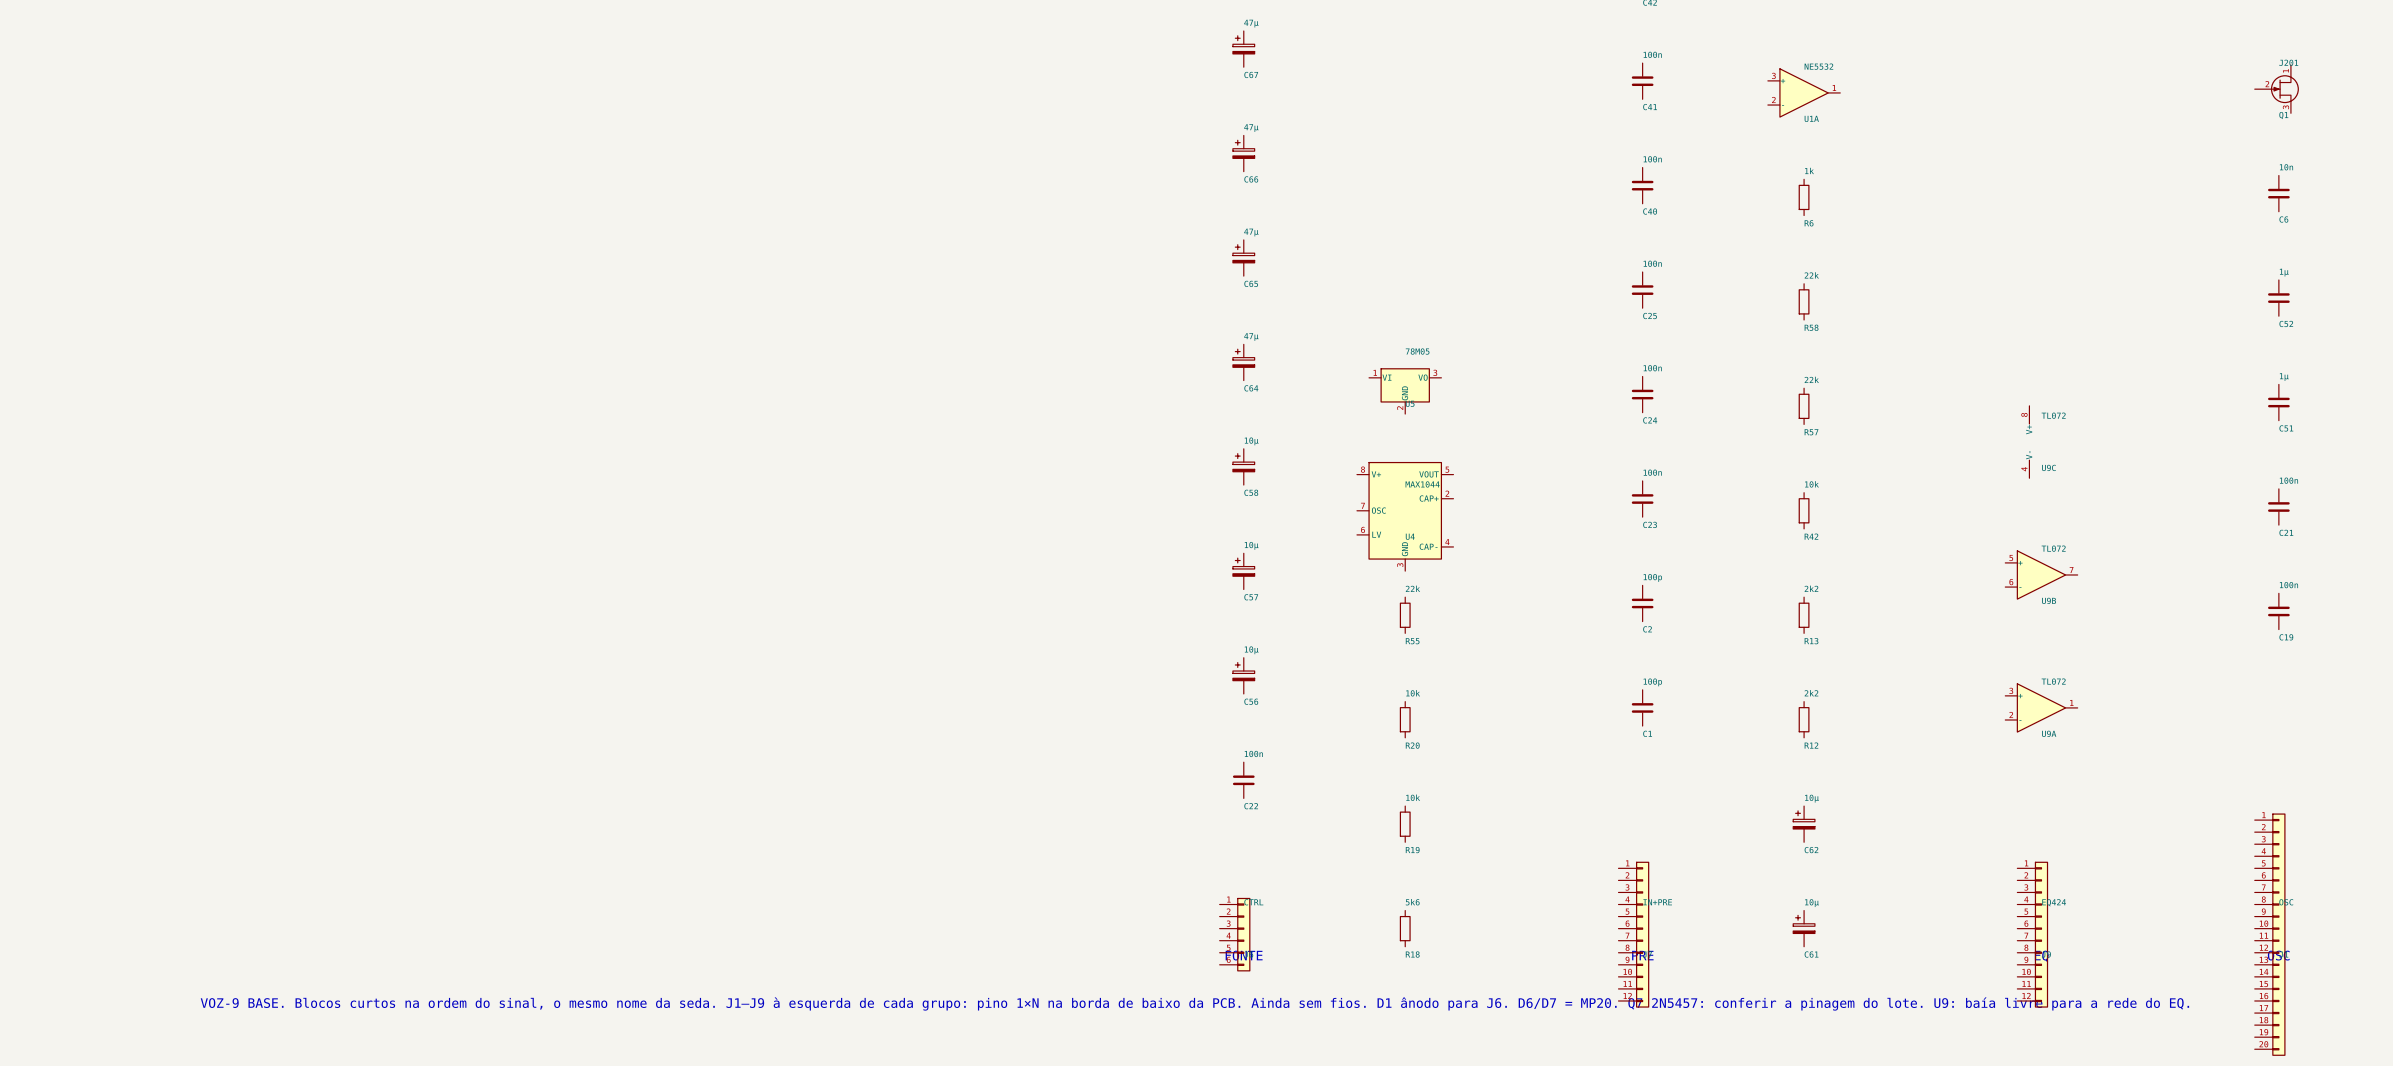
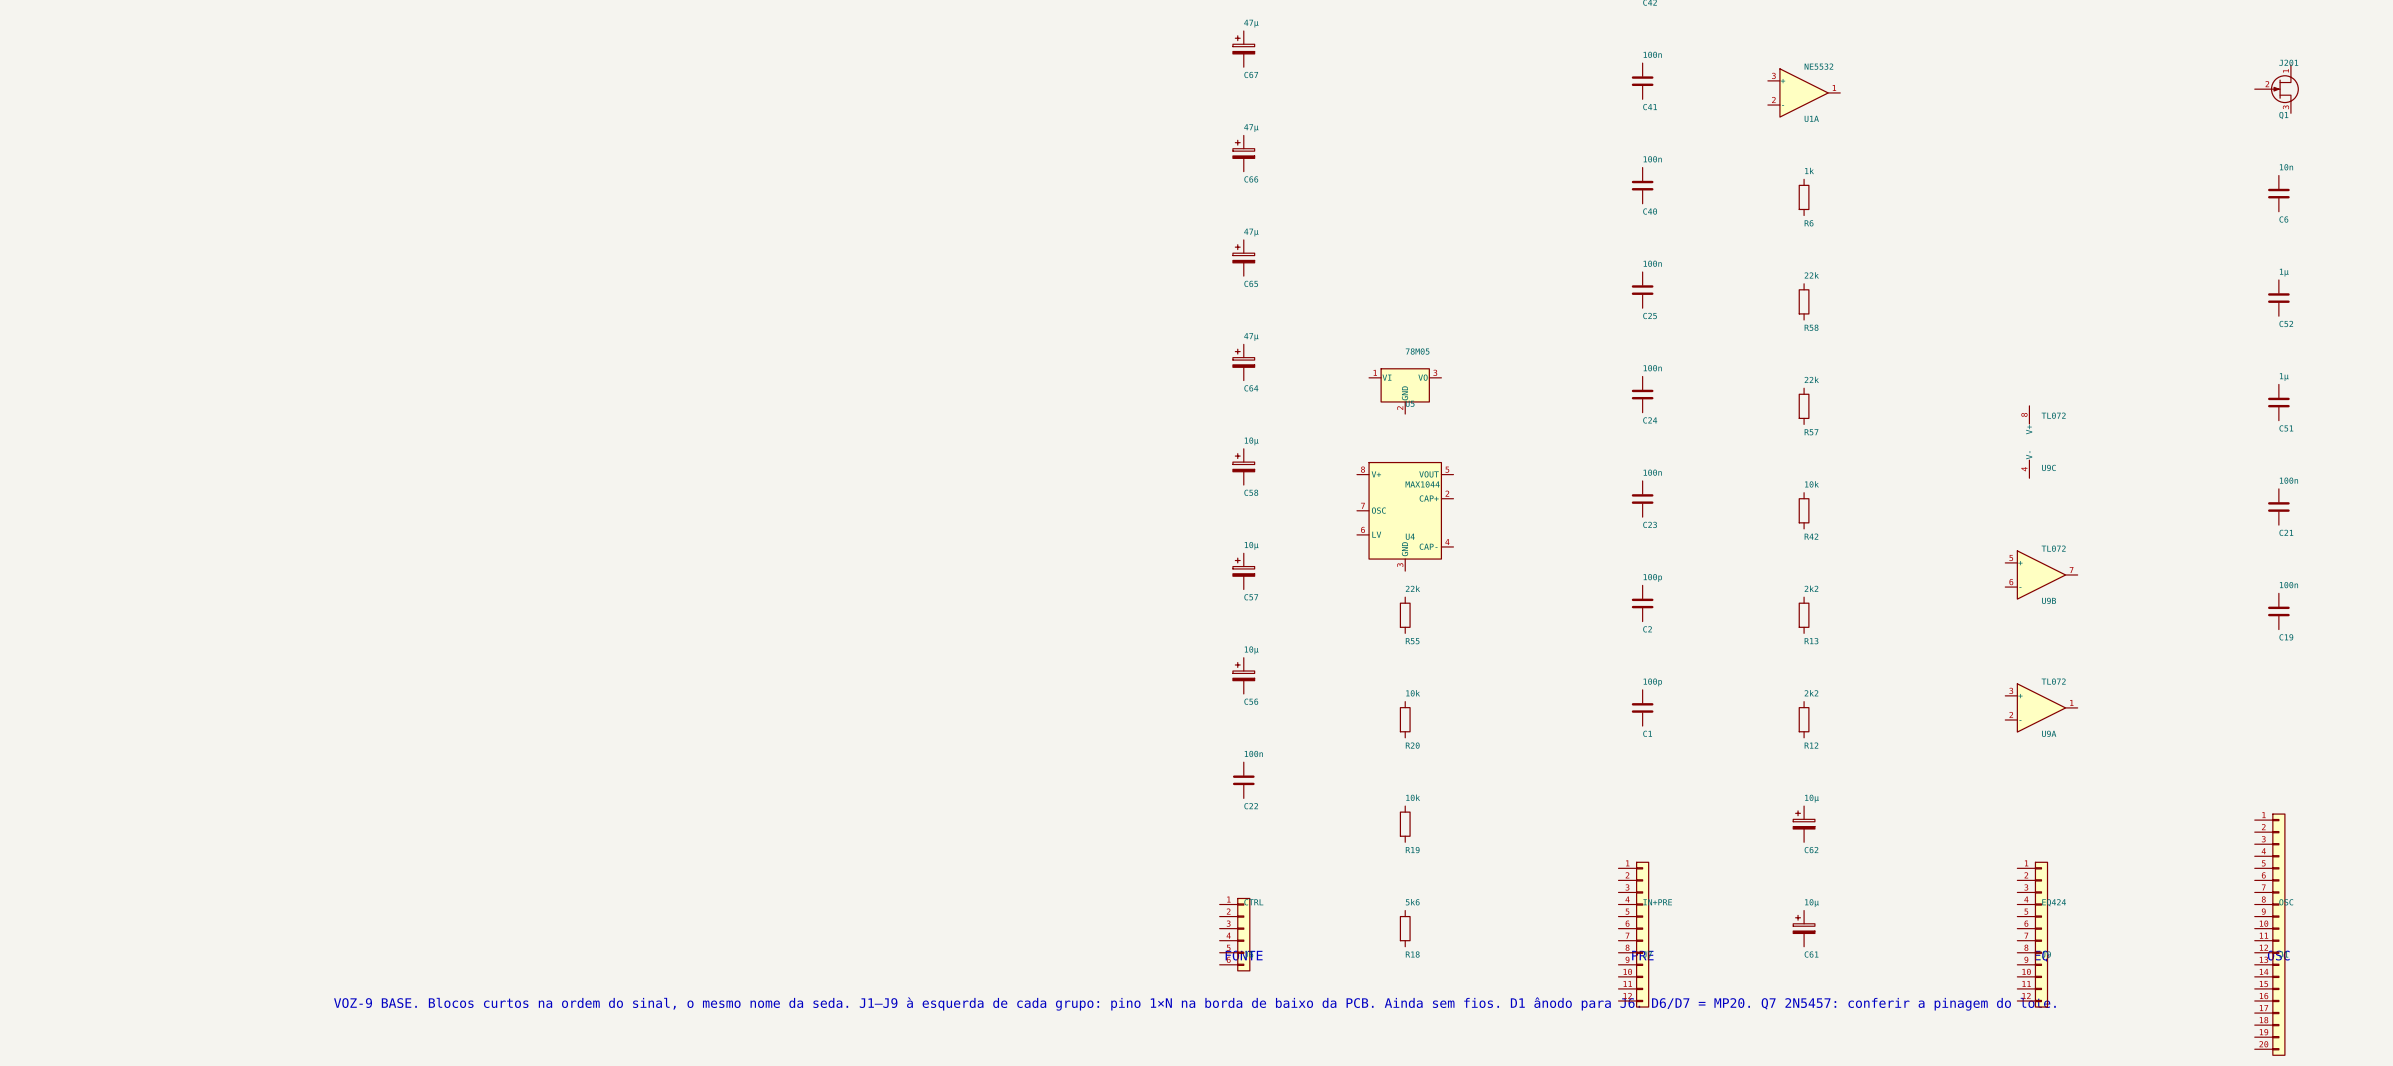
text: VOZ-9 BASE. Blocos curtos na ordem do sinal, o mesmo nome da seda. J1–J9 à esquerda de cada grupo: pino 1×N na borda de baixo da PCB. Ainda sem fios. D1 ânodo para J6. D6/D7 = MP20. Q7 2N5457: conferir a pinagem do lote. U9: baía livre para a rede do EQ. (1194, 1004) -> VOZ-9 BASE. Blocos curtos na ordem do sinal, o mesmo nome da seda. J1–J9 à esquerda de cada grupo: pino 1×N na borda de baixo da PCB. Ainda sem fios. D1 ânodo para J6. D6/D7 = MP20. Q7 2N5457: conferir a pinagem do lote. (1194, 1004)

